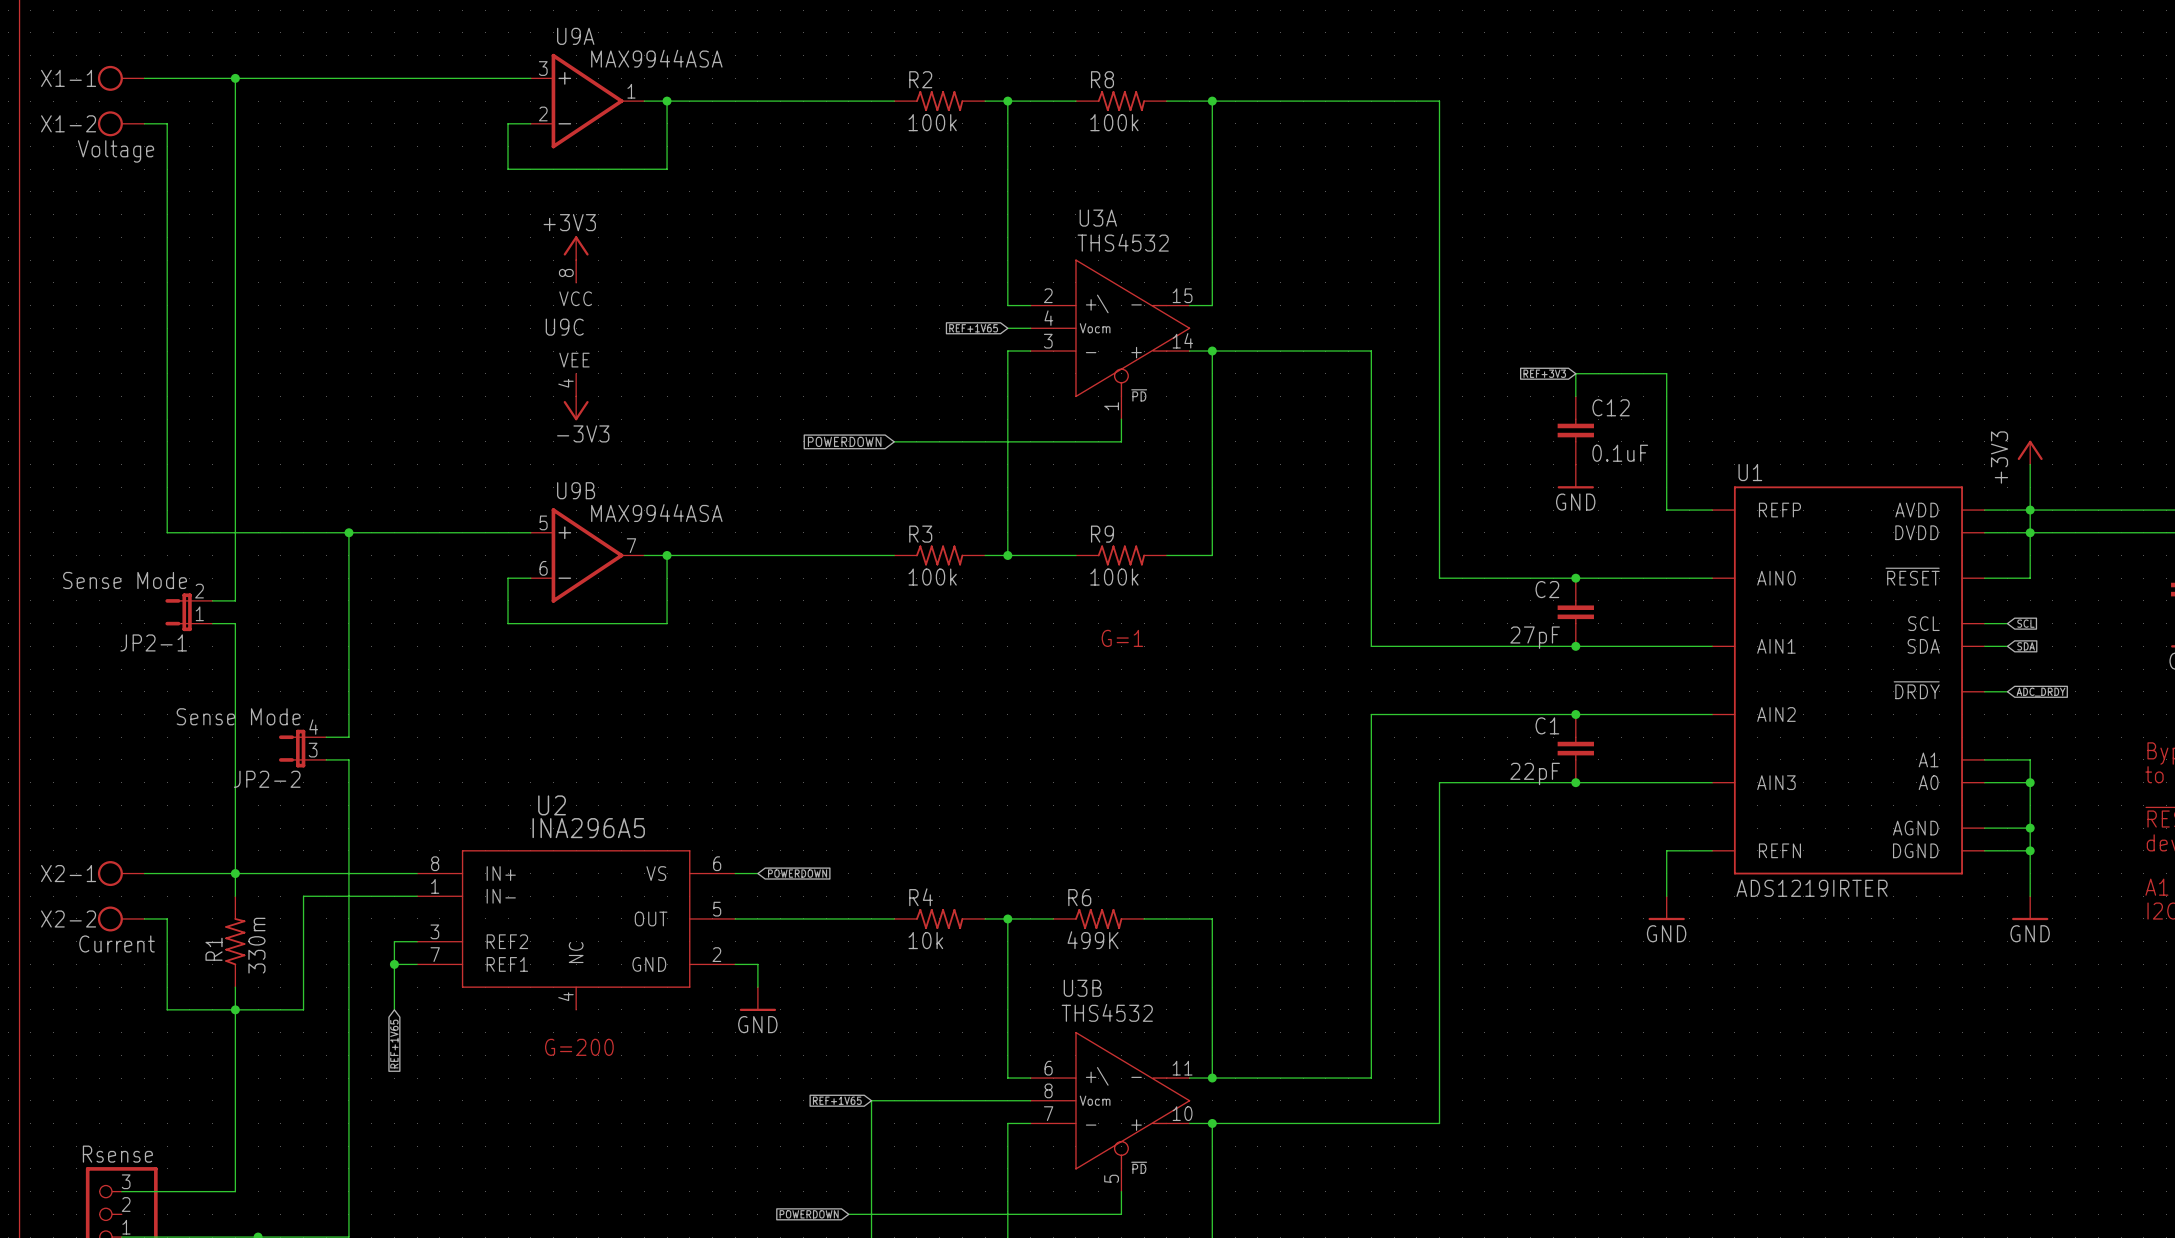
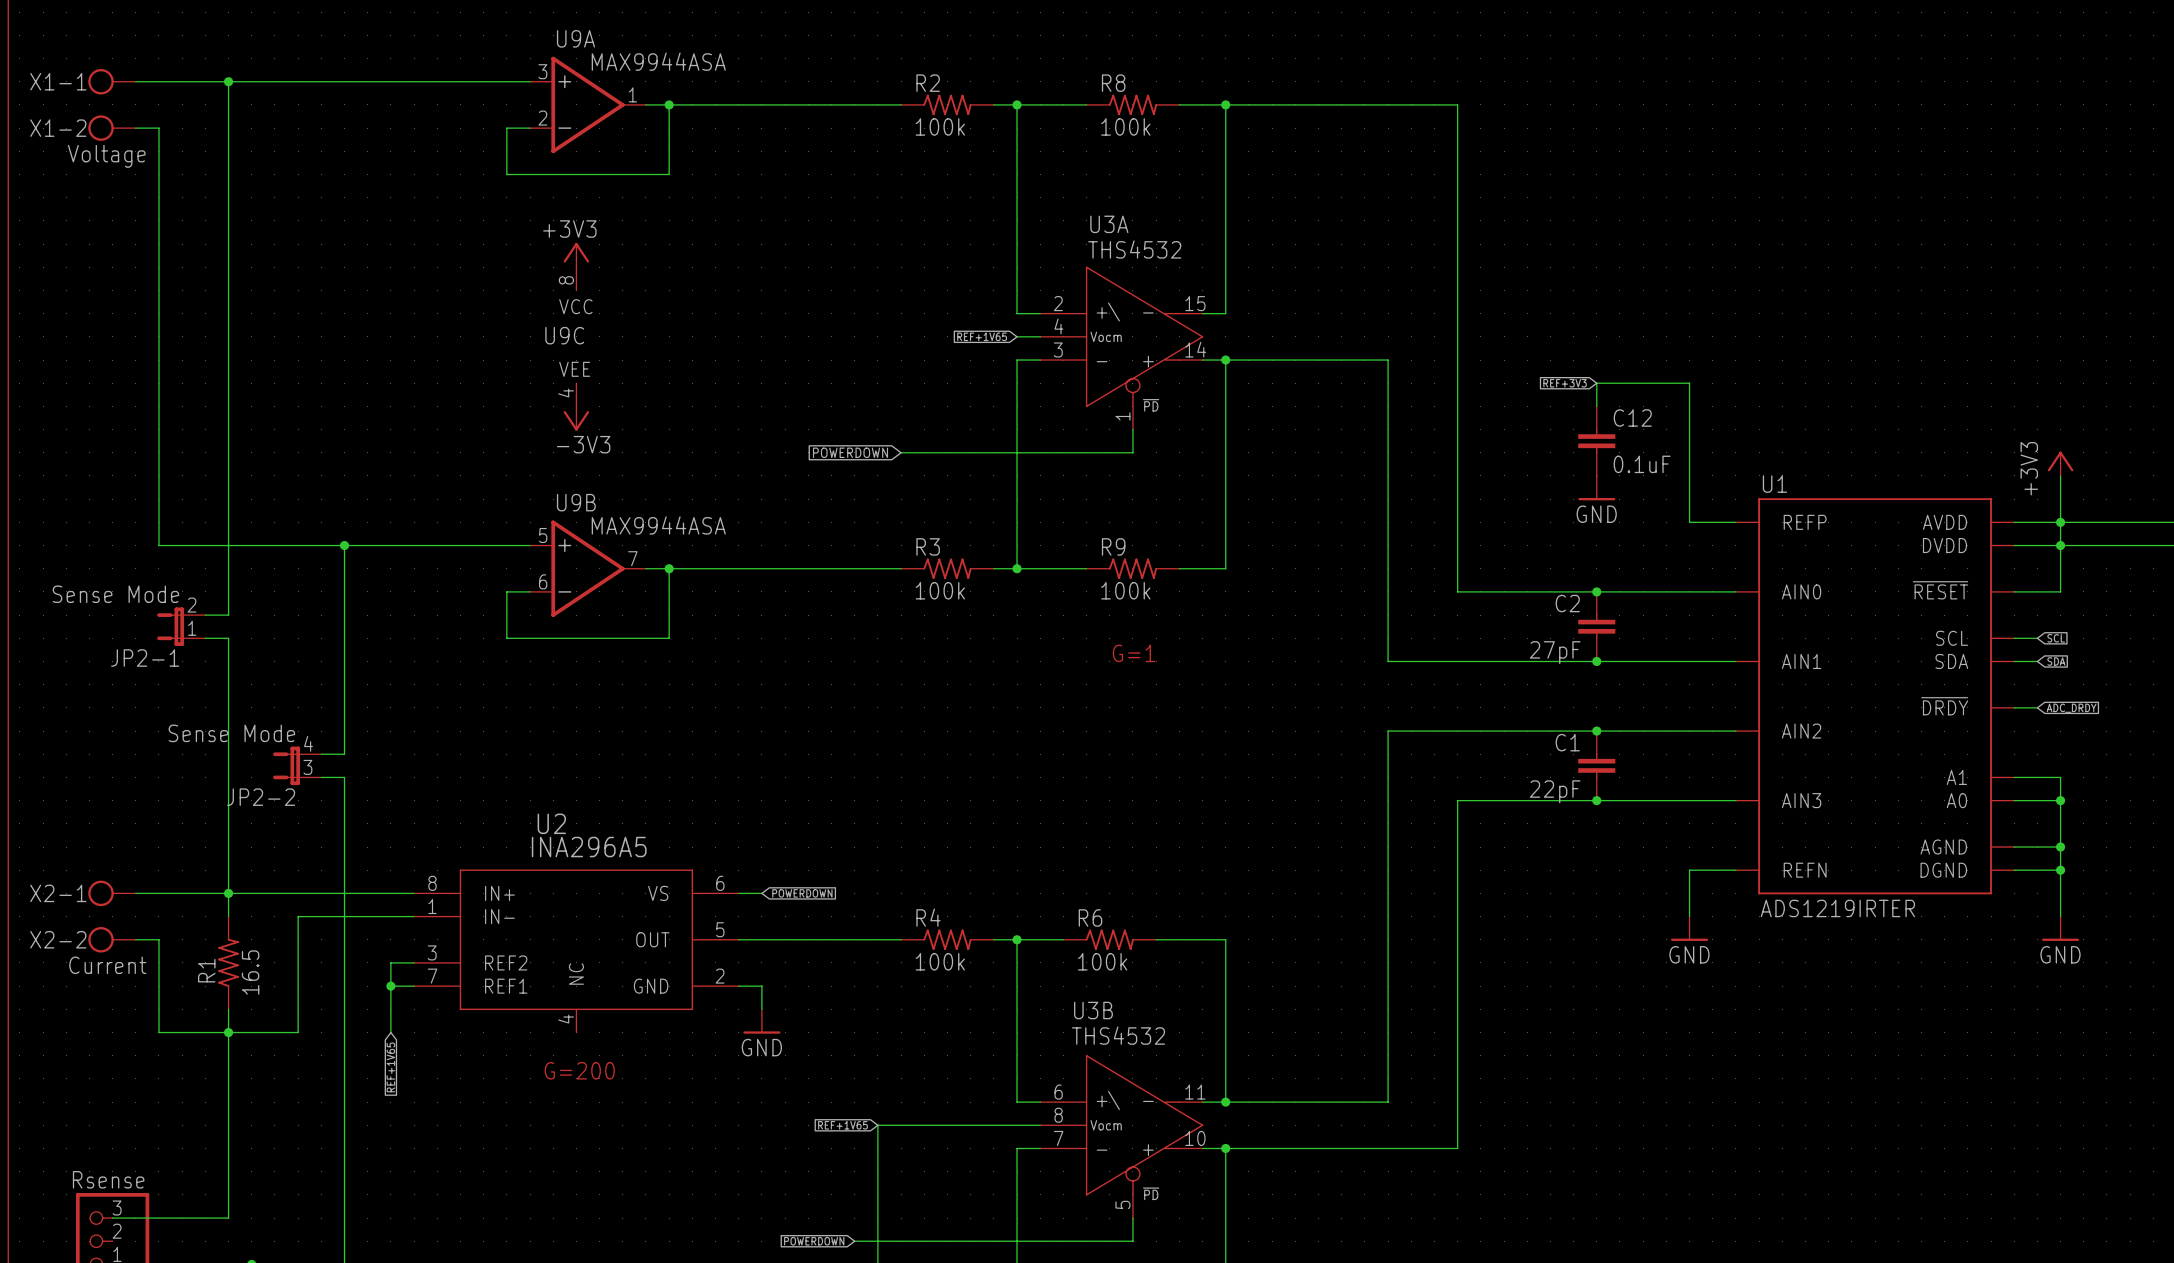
R4 value: 10k (925, 940) -> 100k (940, 961)
R6 value: 499K (1093, 940) -> 100k (1102, 961)
R1 value: 330m (256, 945) -> 16.5 (250, 972)

